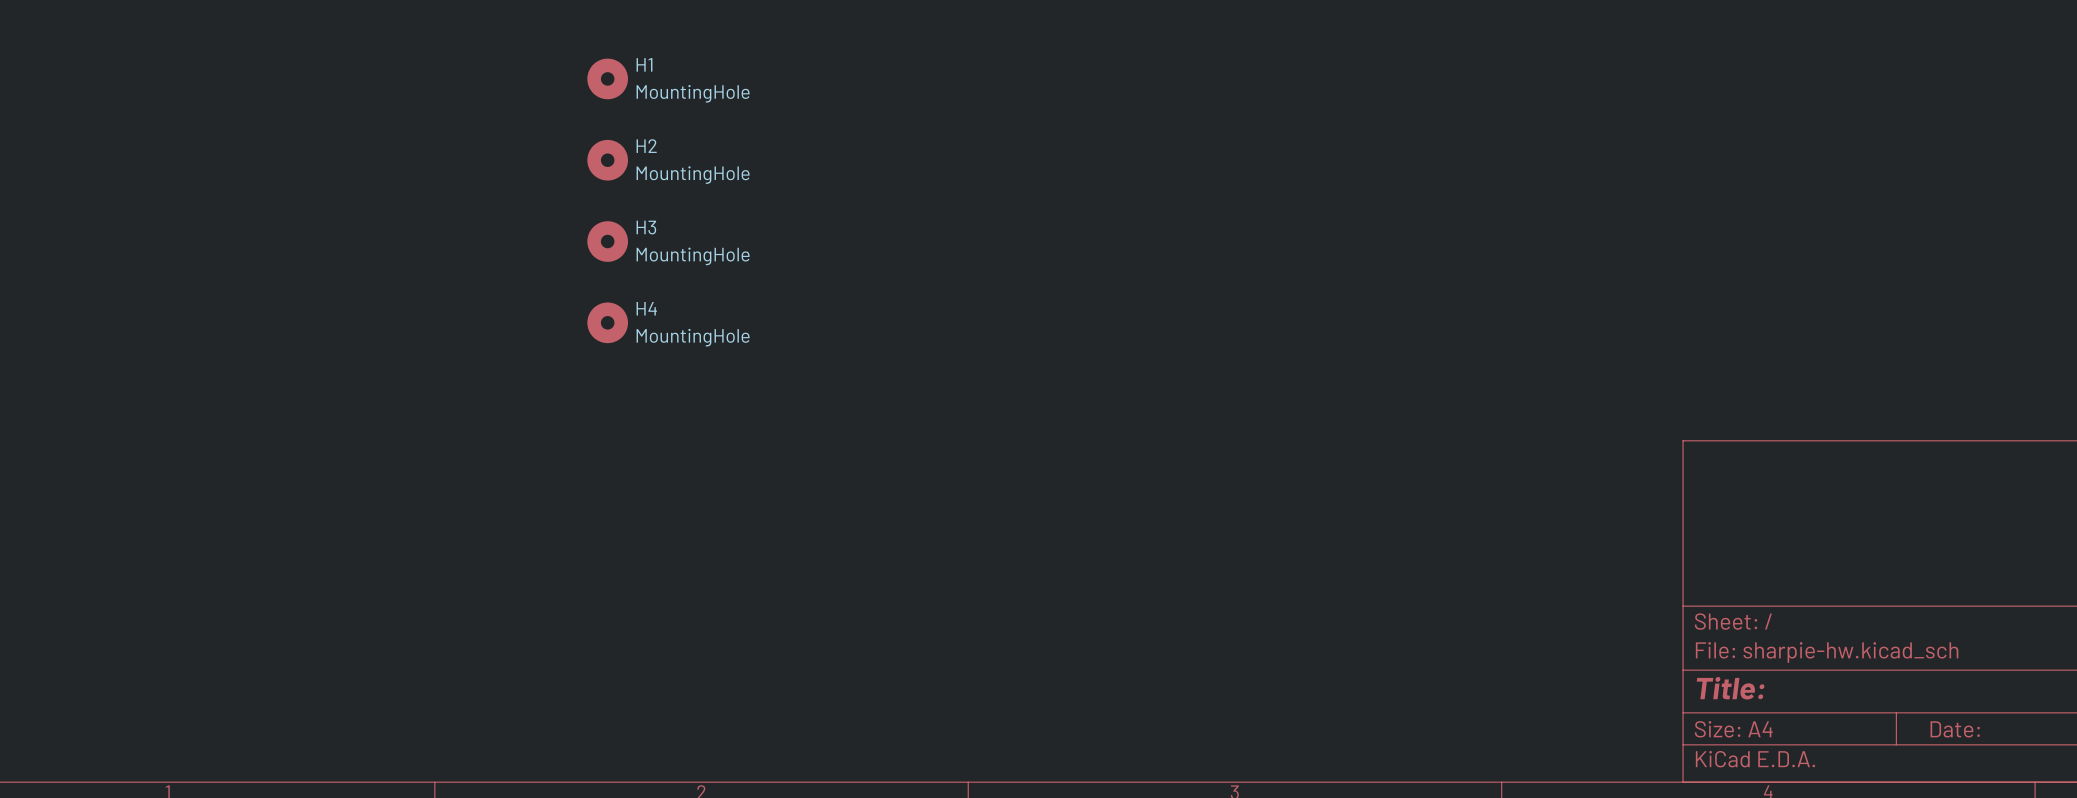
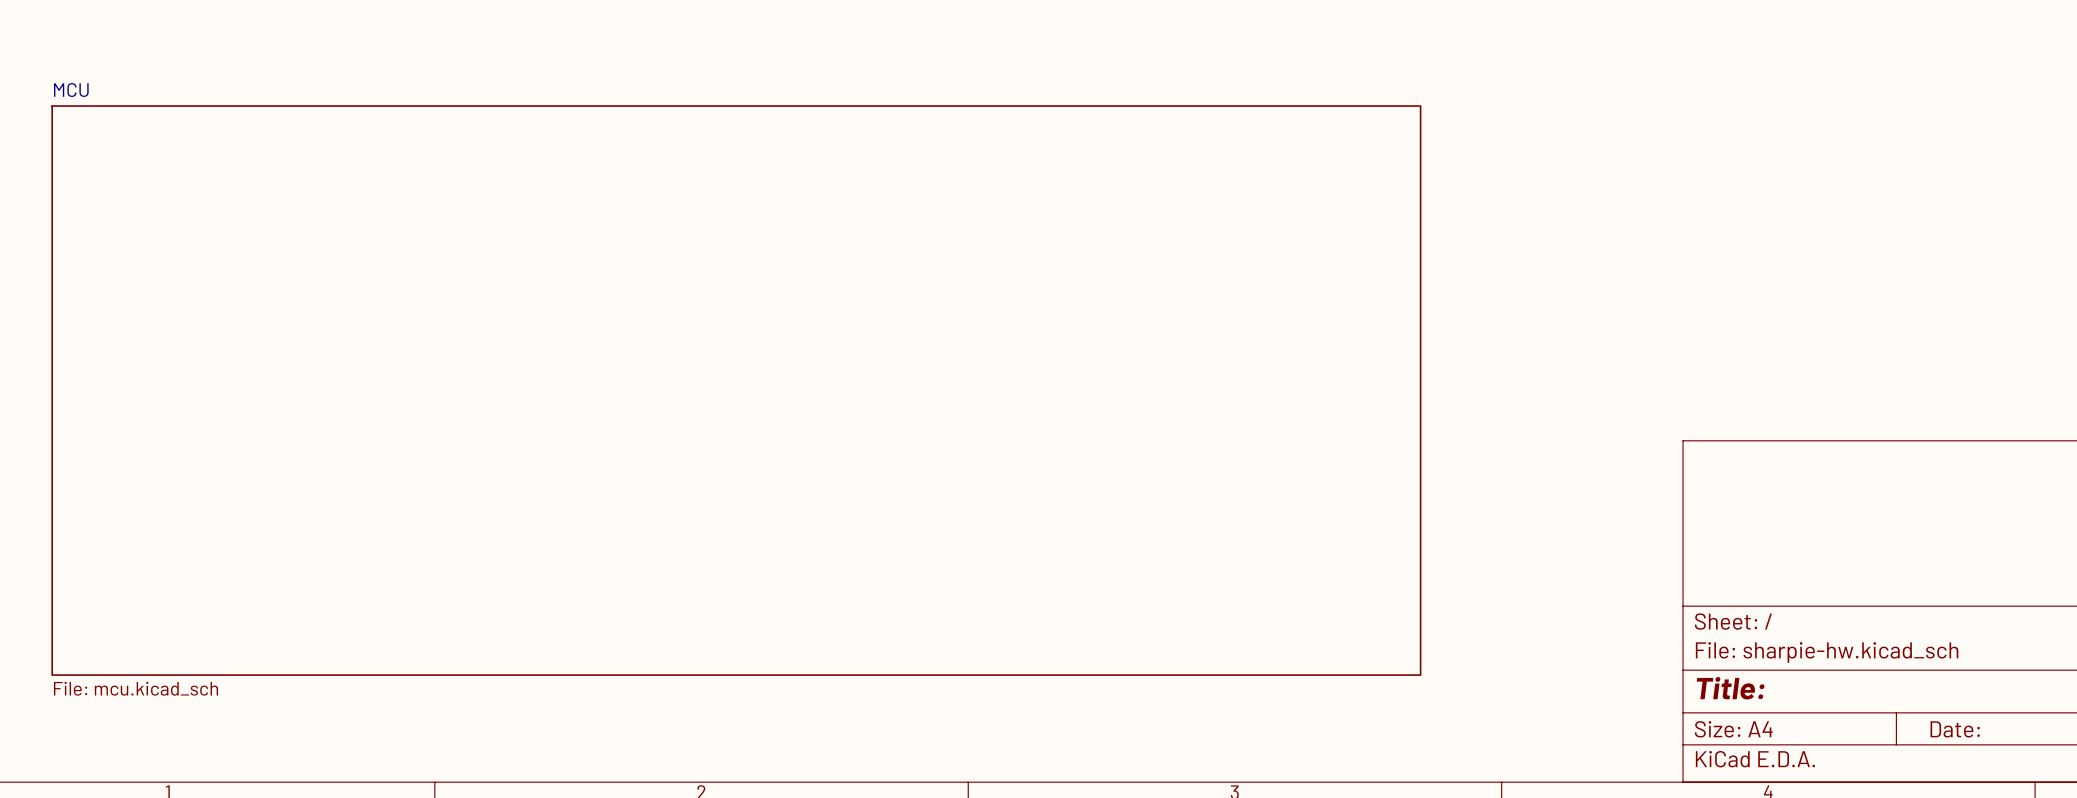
H1: MountingHole (607, 78) -> none
H2: MountingHole (607, 160) -> none
H3: MountingHole (607, 241) -> none
H4: MountingHole (607, 322) -> none
sheet MCU: none -> File: mcu.kicad_sch (736, 390)

